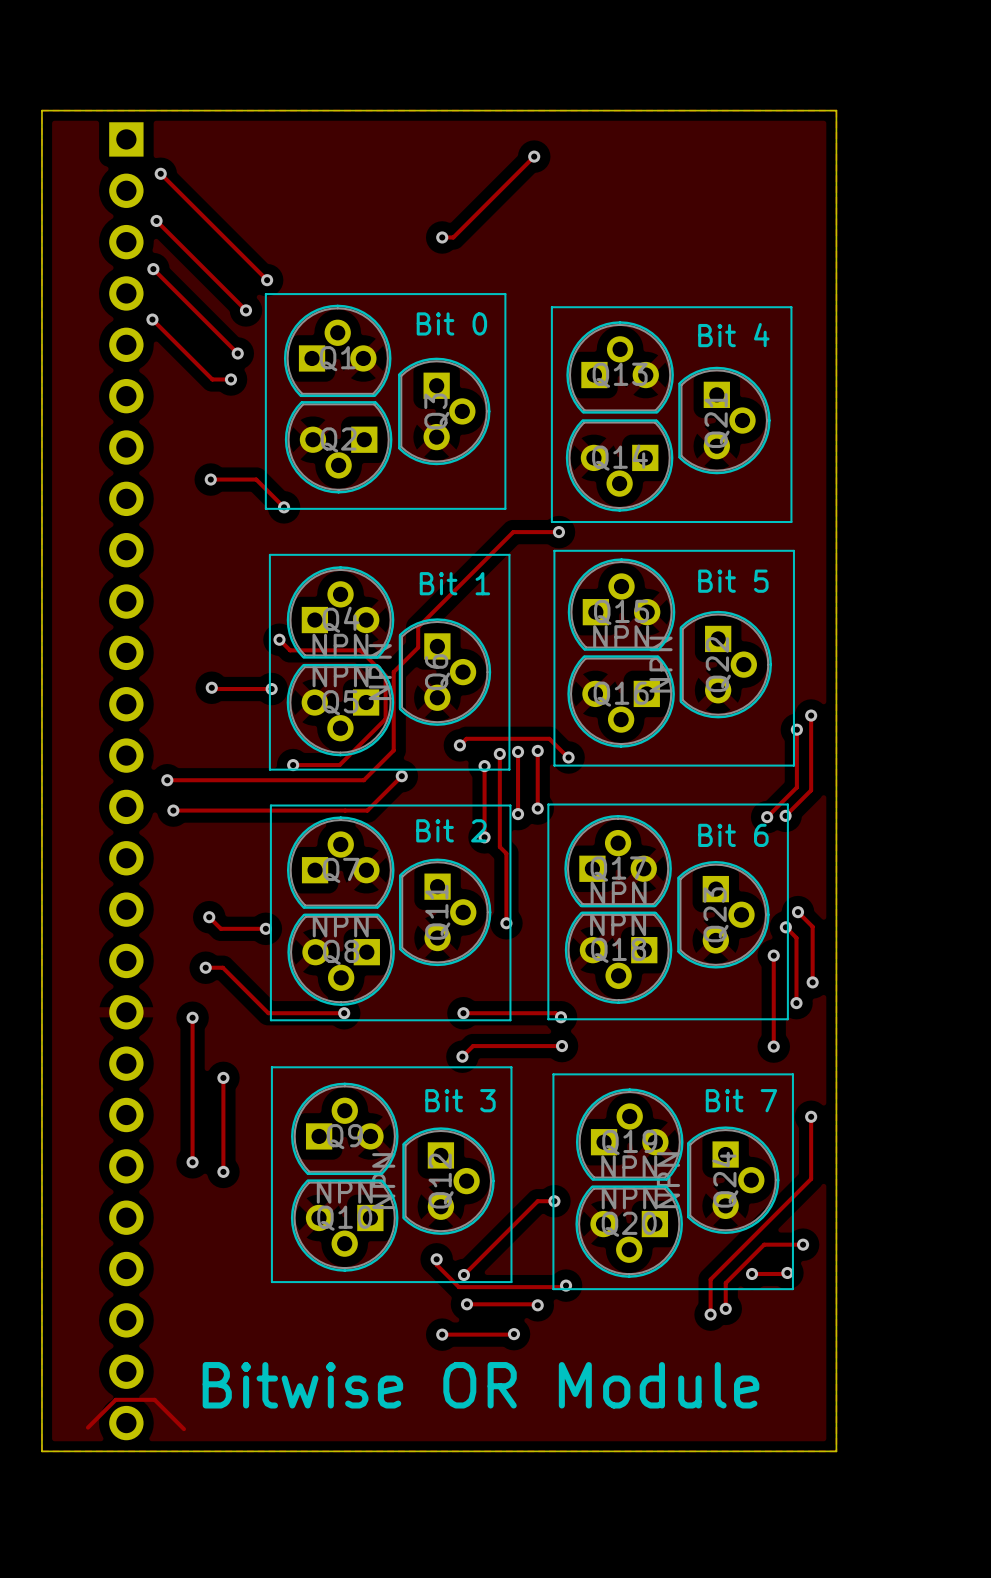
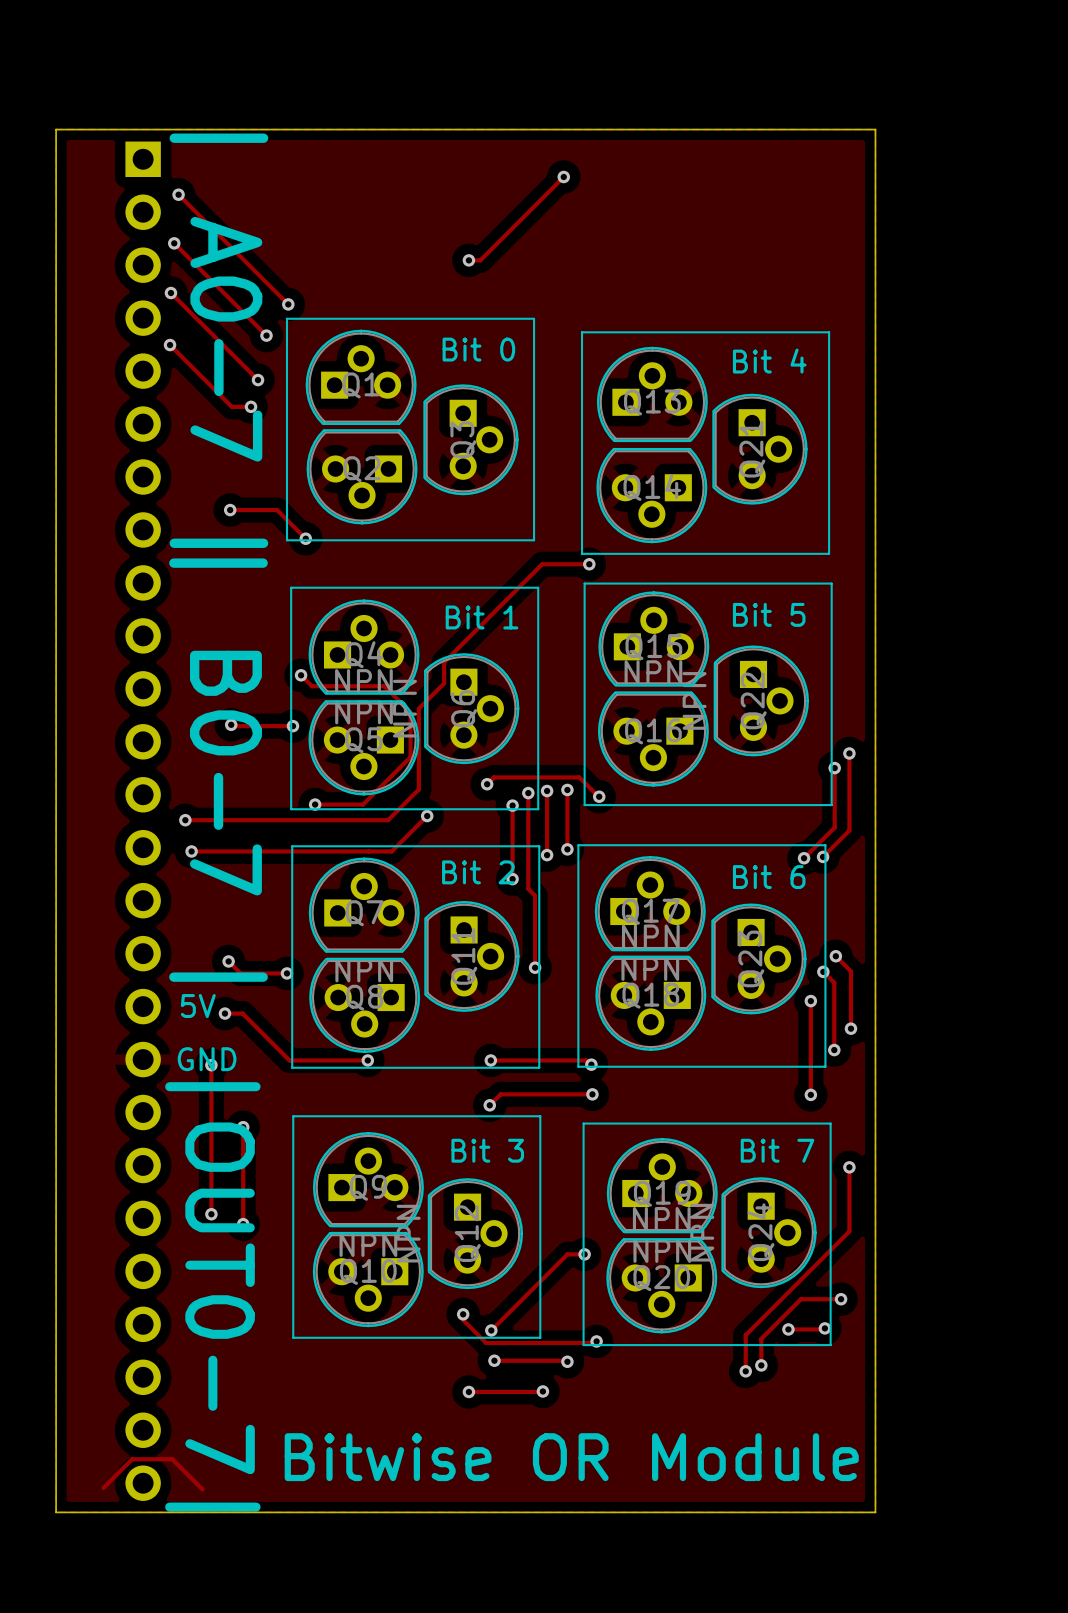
text: none -> | A0-7 | (218, 340)
text: none -> | B0-7 | (218, 770)
text: none -> 5V (198, 1006)
text: none -> GND (207, 1059)
text: none -> |OUT0-7| (212, 1296)
text position: Bitwise OR Module (480, 1385) -> Bitwise OR Module (571, 1457)

